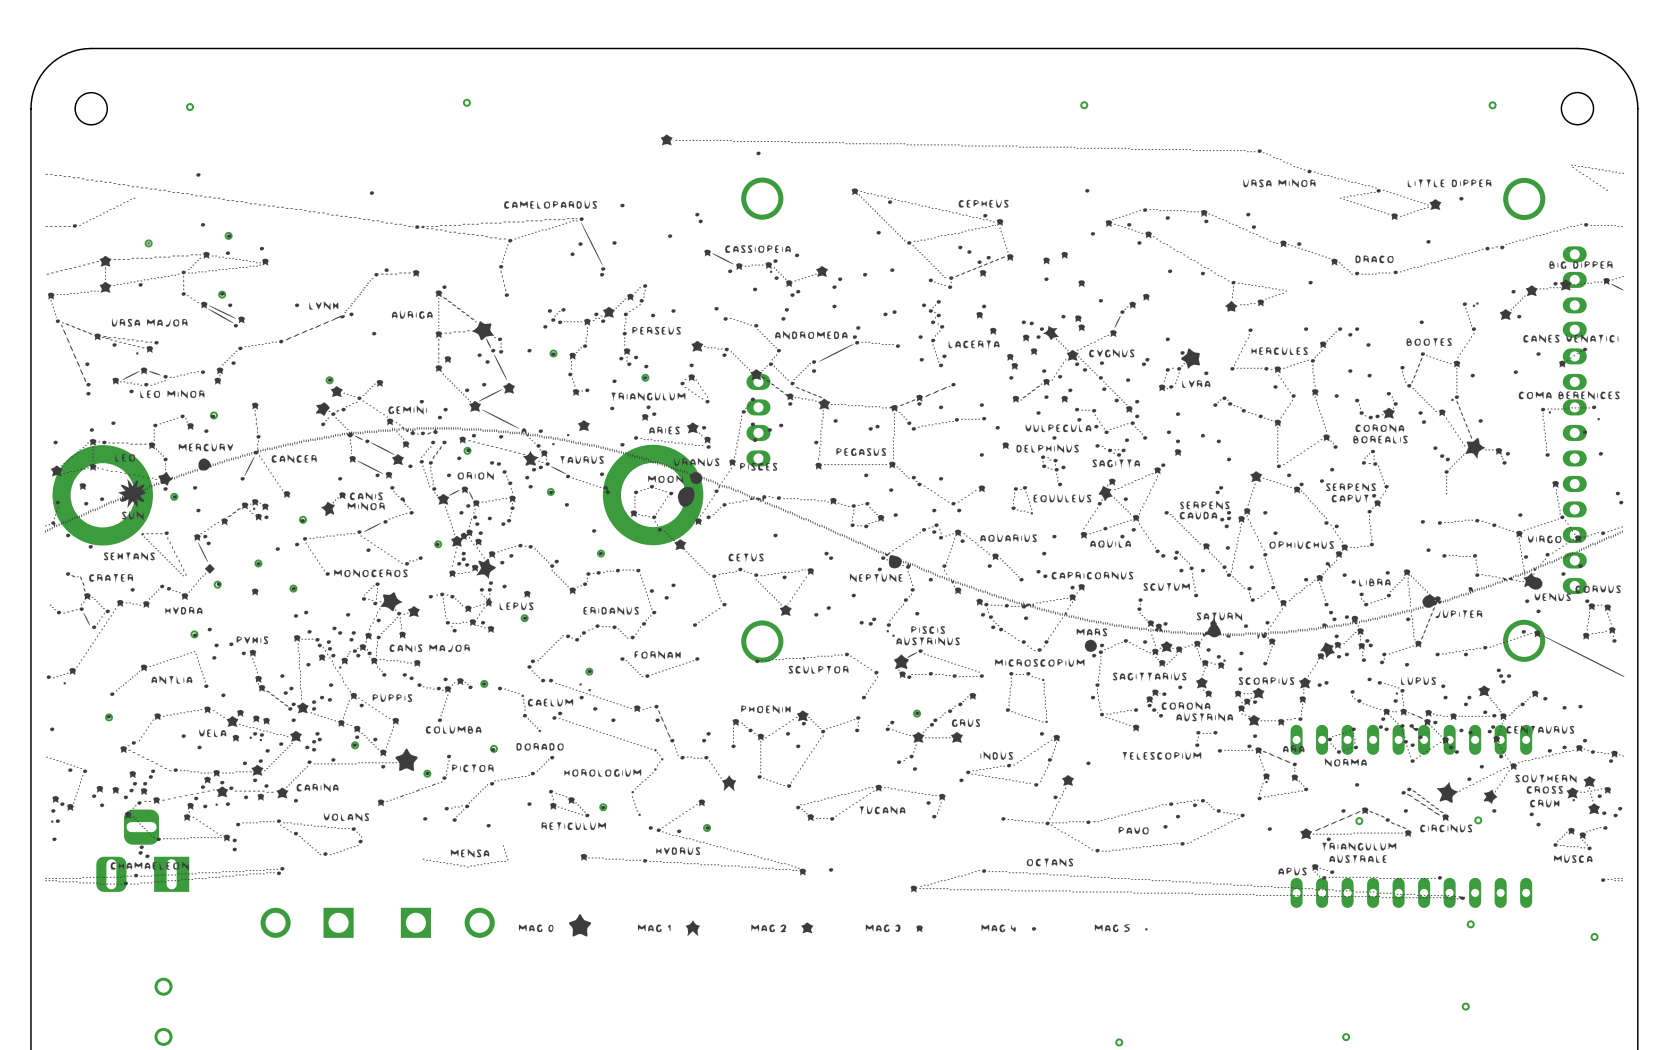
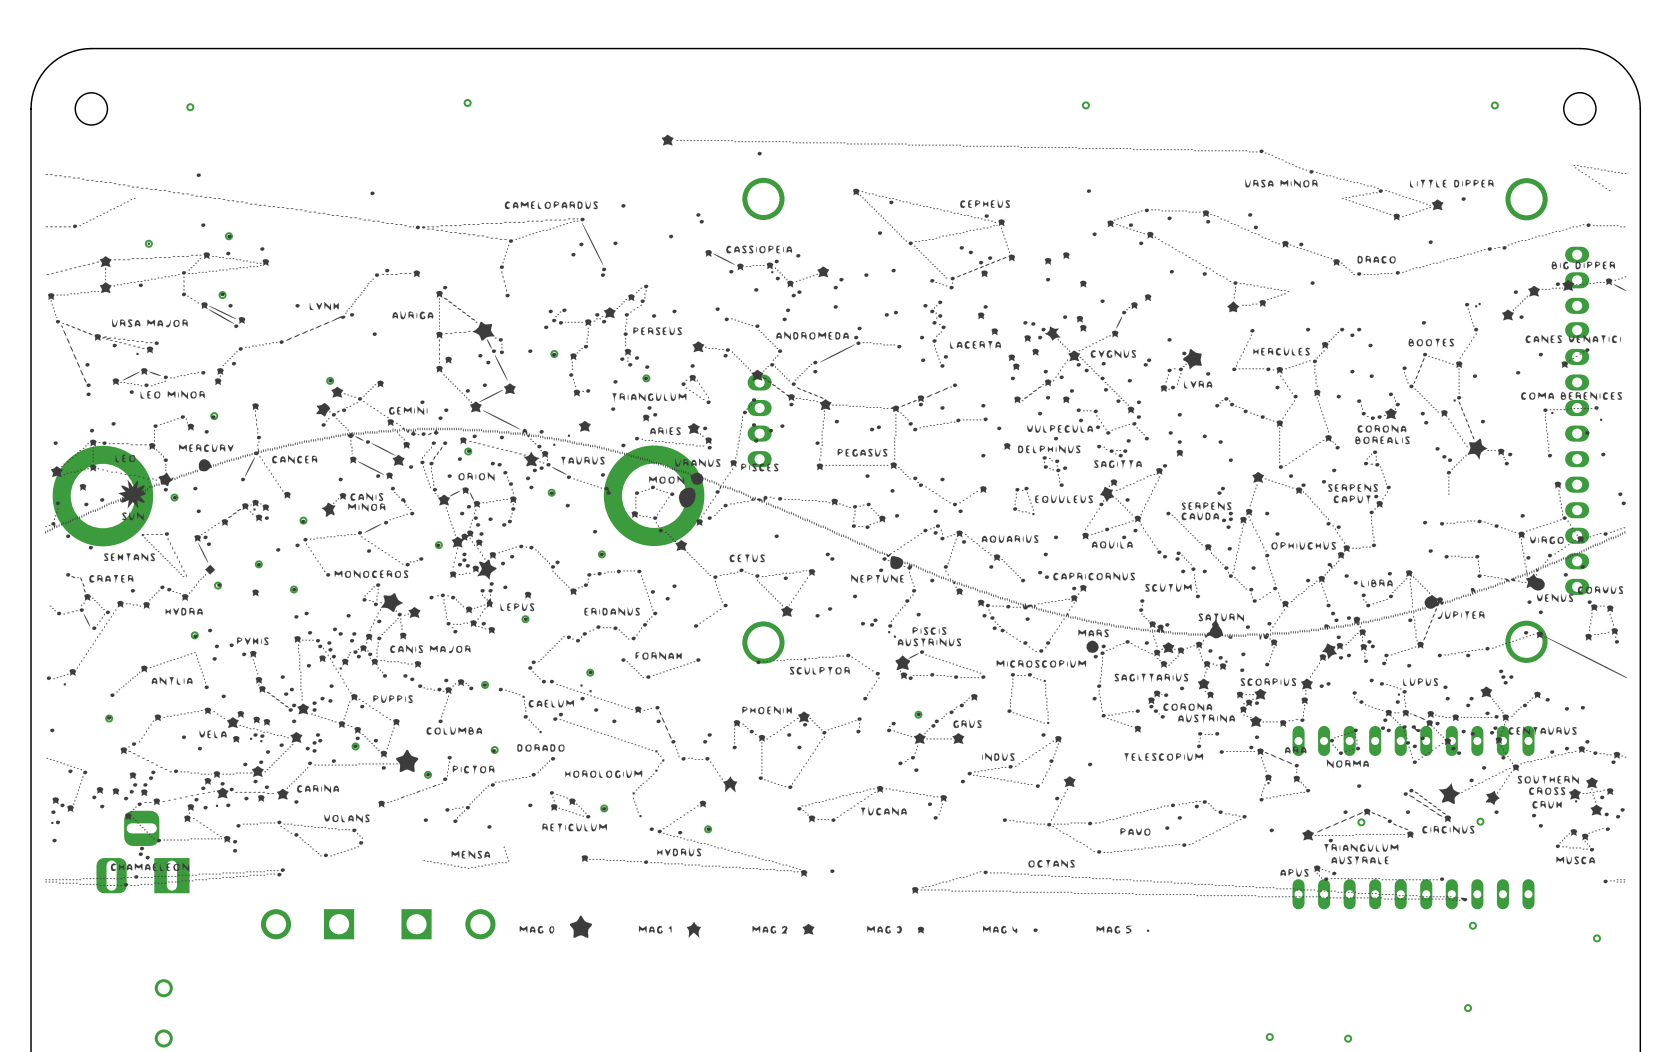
via: none -> (1269, 1037)
via: (1119, 1042) -> none

